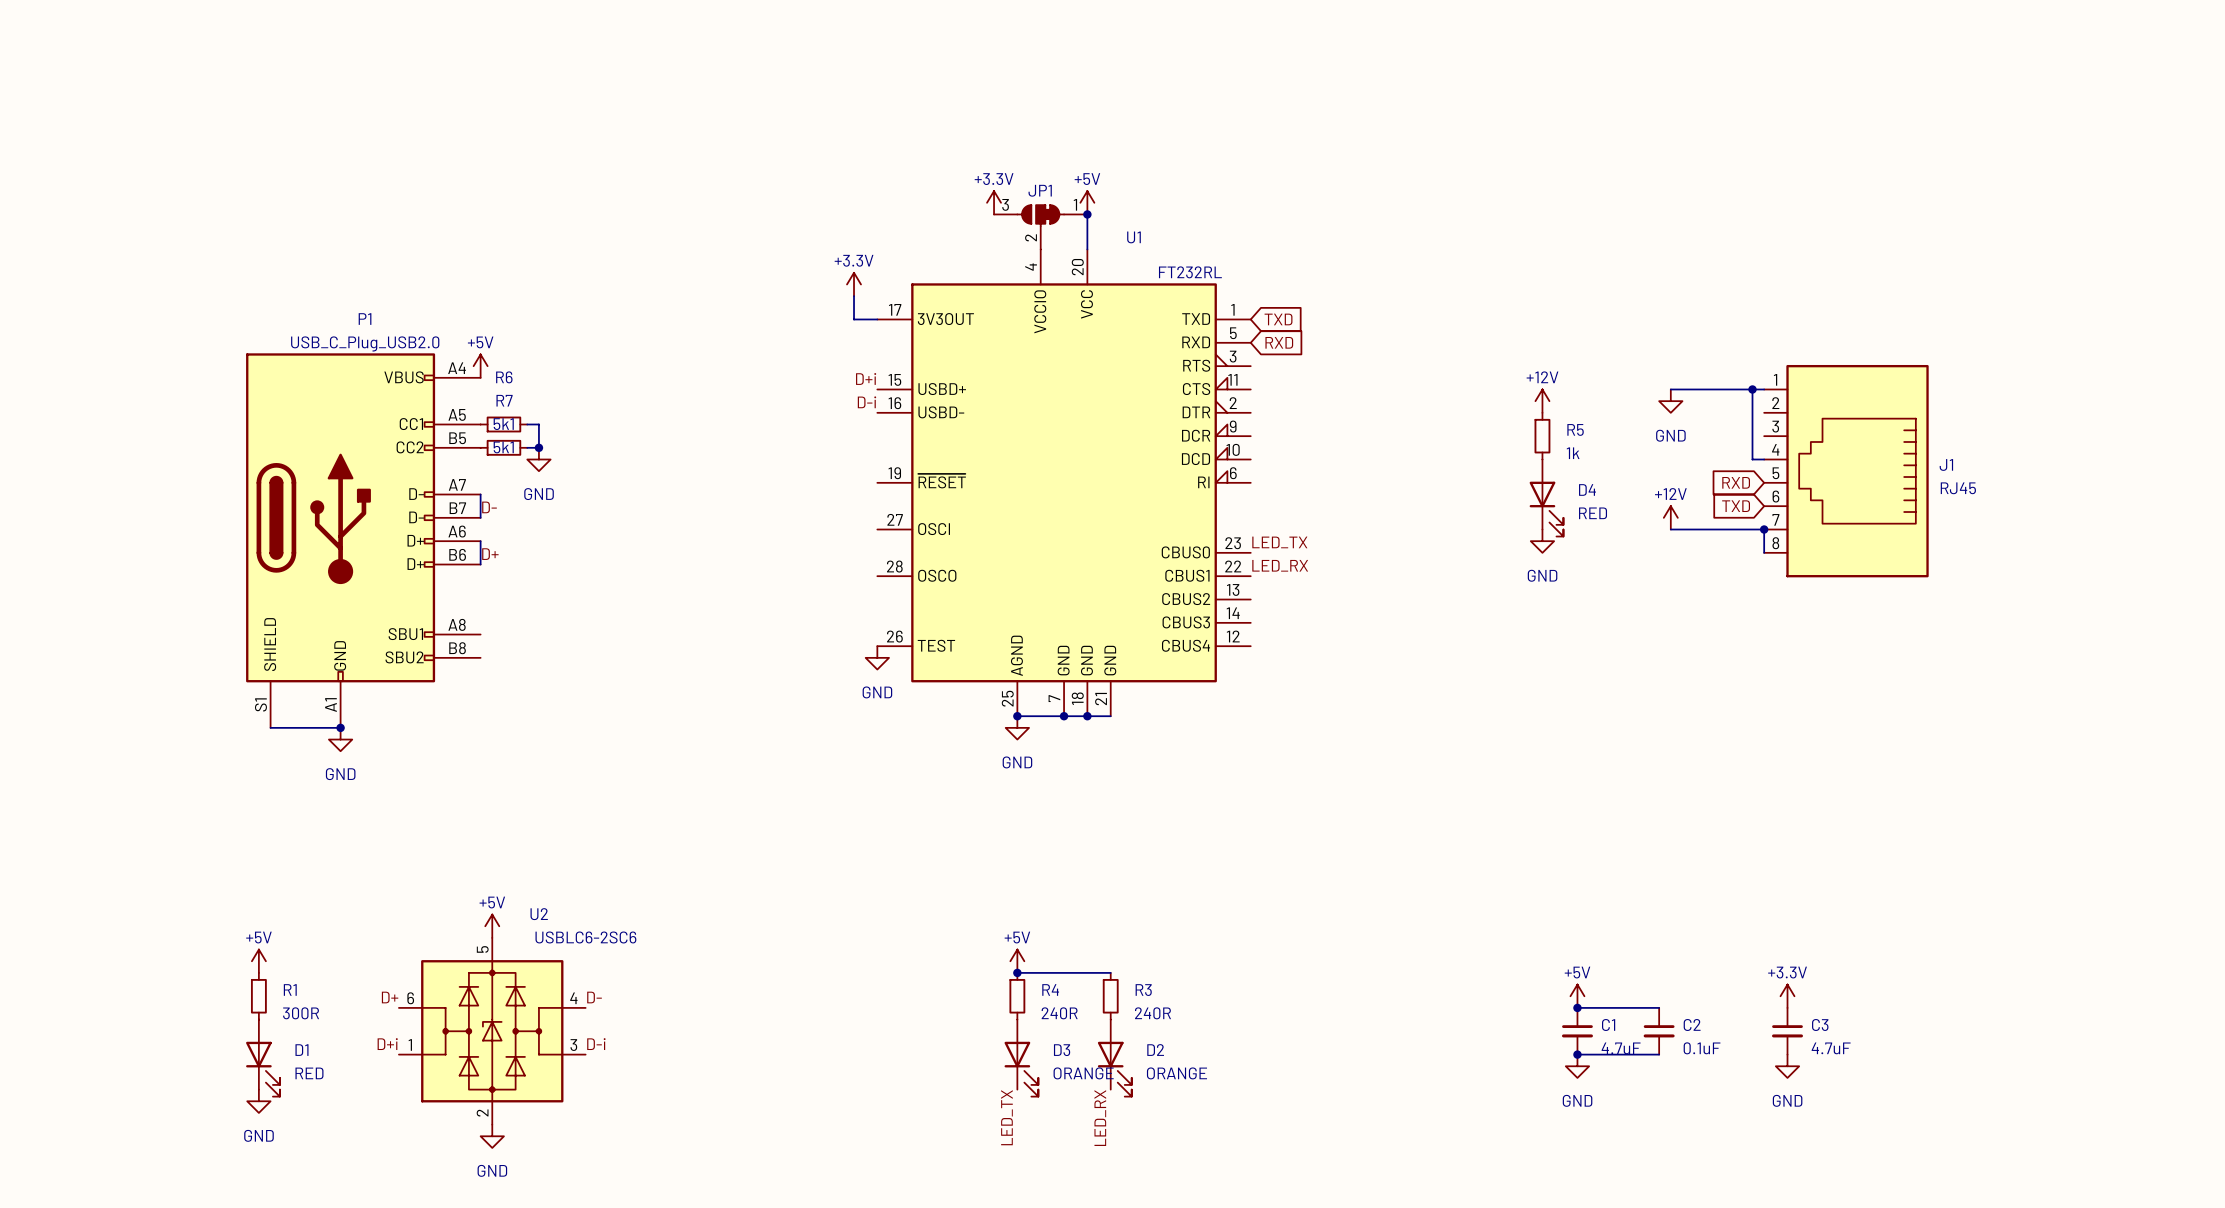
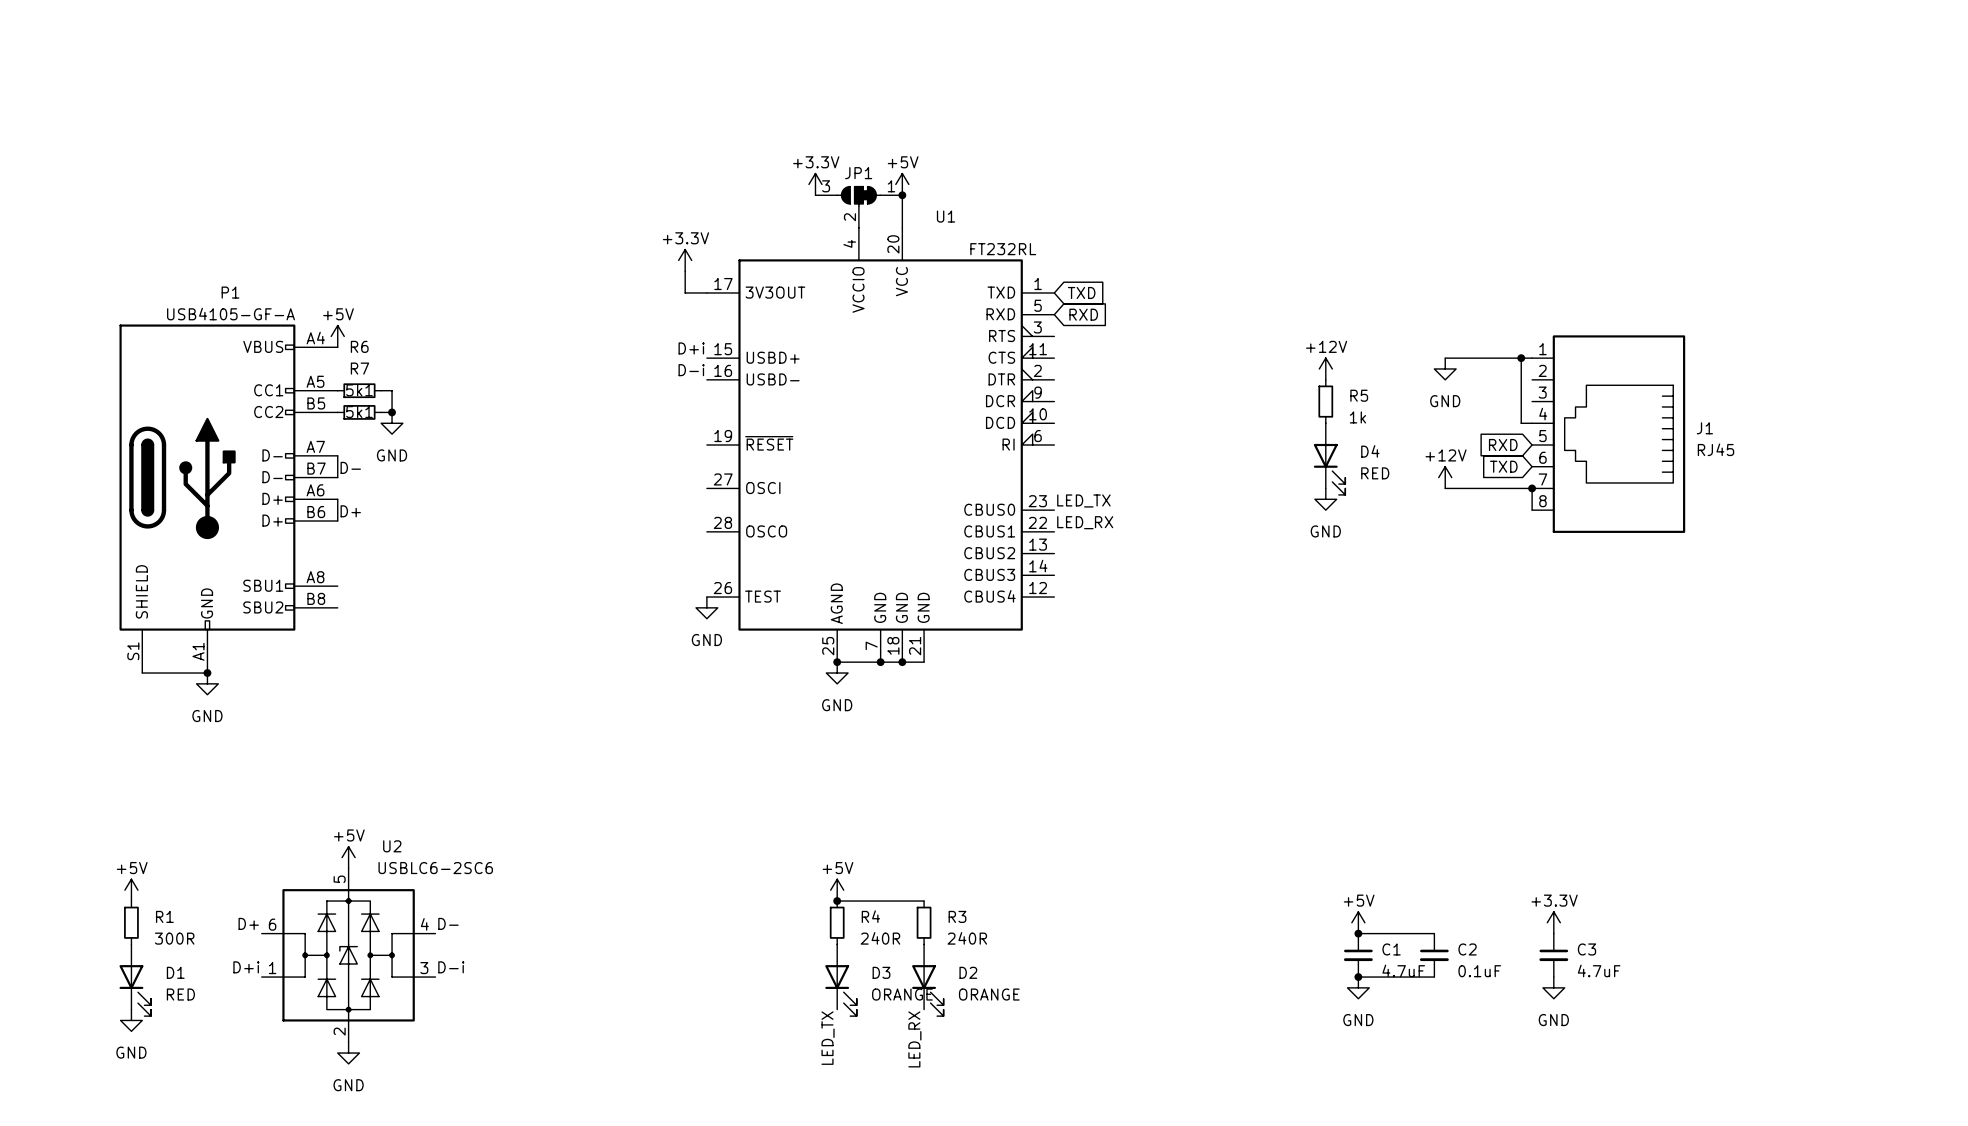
P1 value: USB_C_Plug_USB2.0 (365, 343) -> USB4105-GF-A (231, 314)

